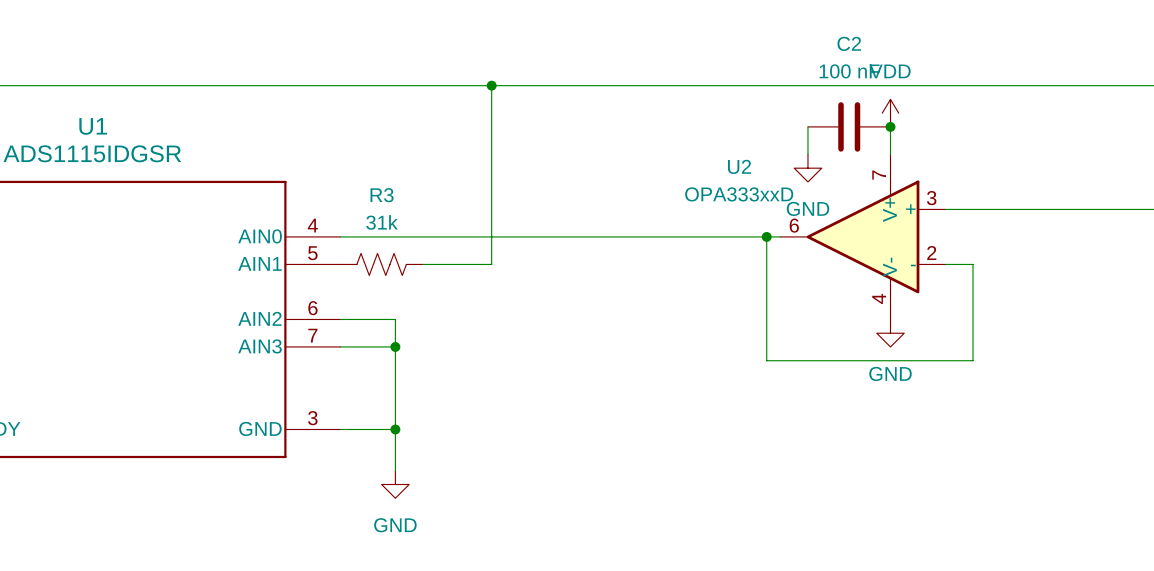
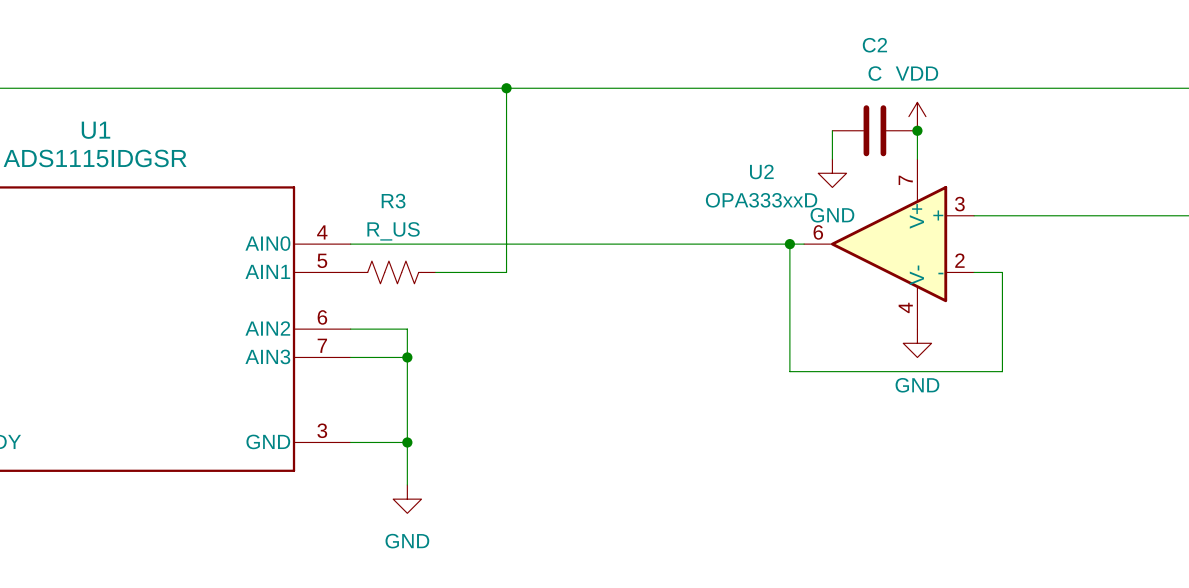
C2 value: 100 nF (849, 71) -> C (875, 73)
R3 value: 31k (382, 222) -> R_US (393, 231)

